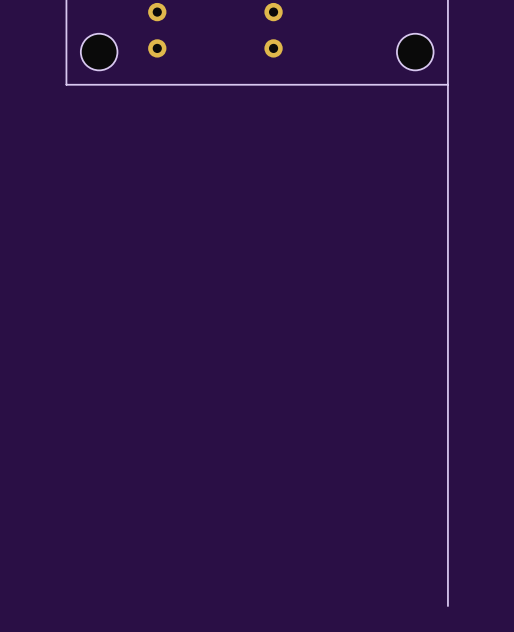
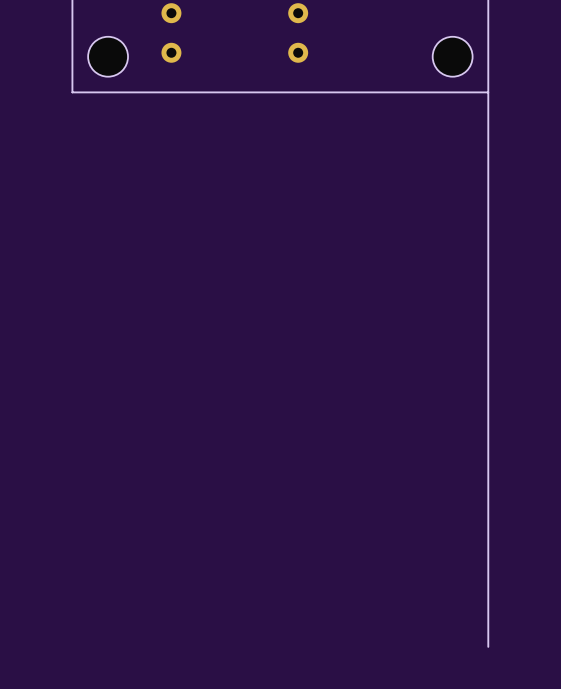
board edge: (447, 593) (447, 606) -> none

